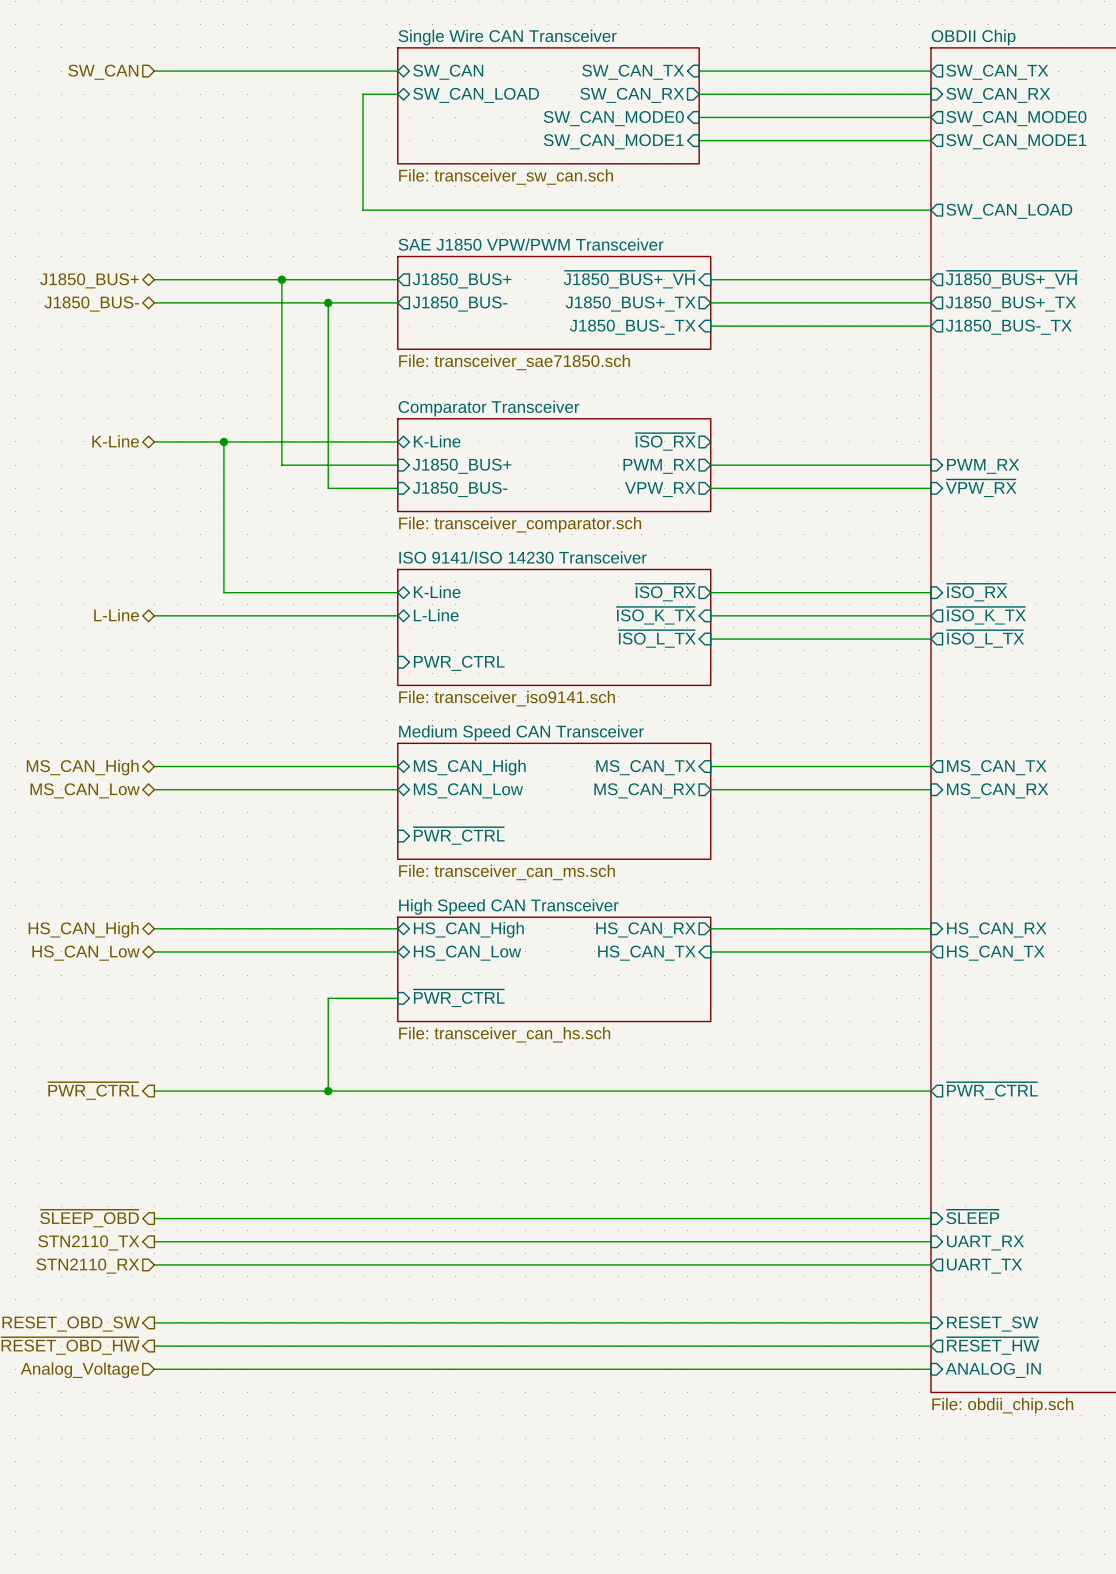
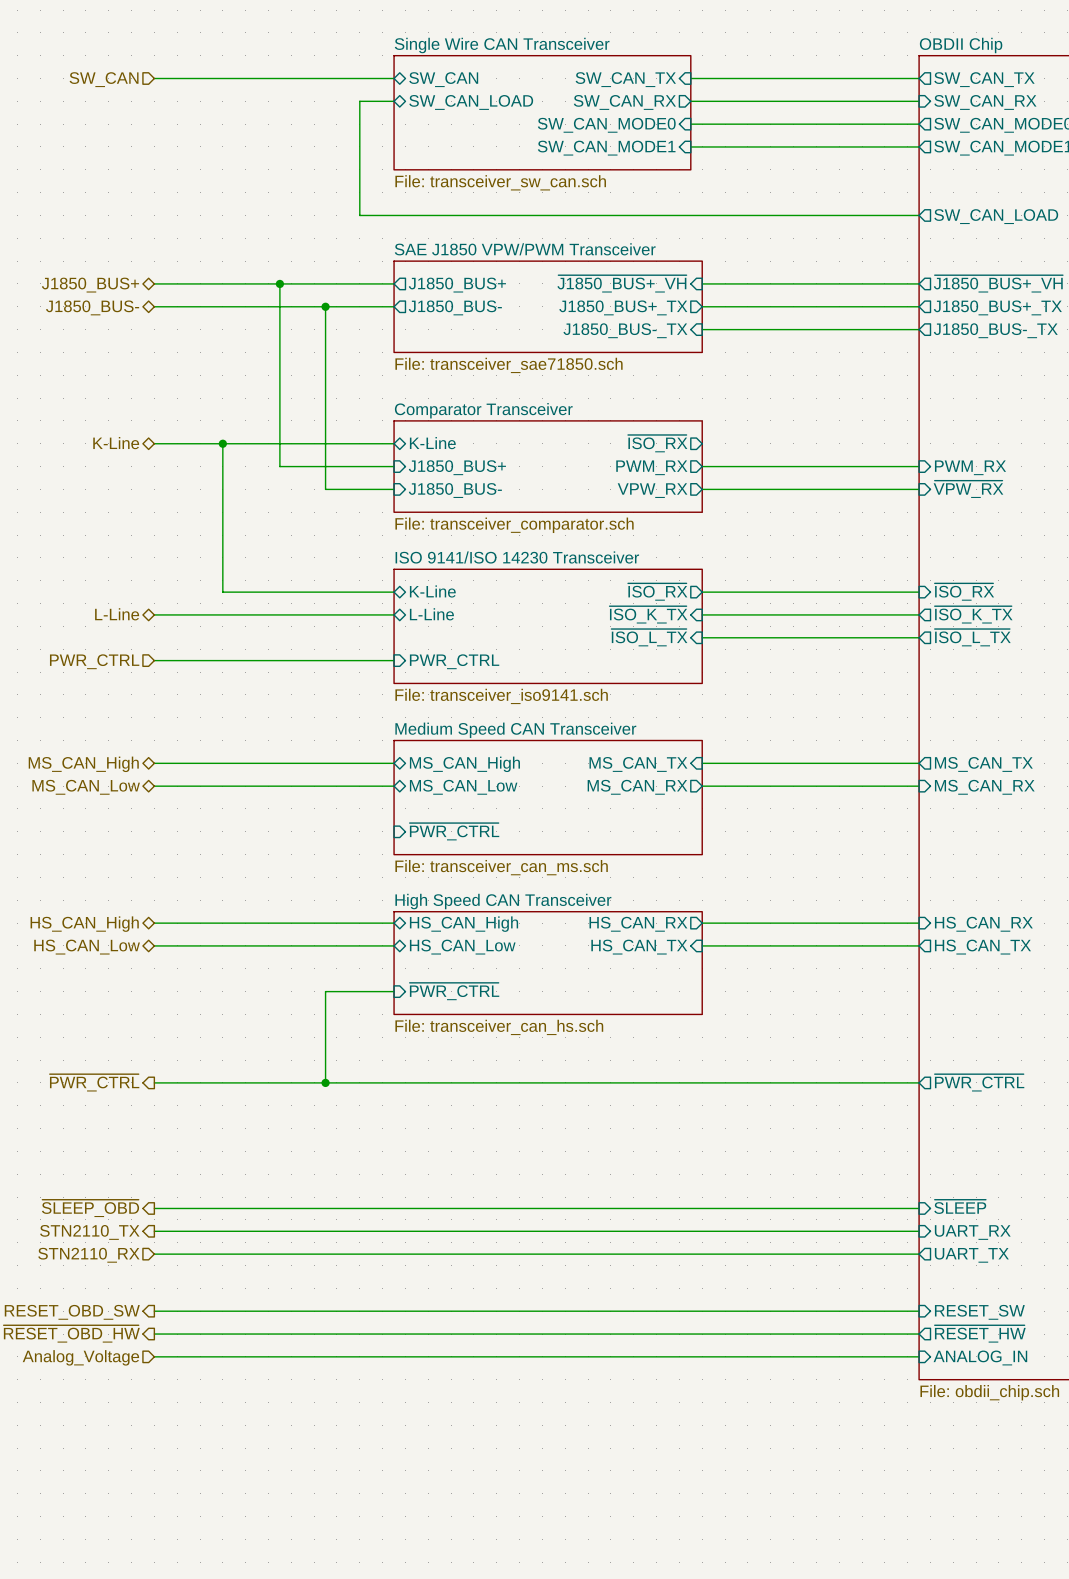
wire: none -> (154, 660) (394, 660)
hierarchical label: none -> PWR_CTRL (94, 661)

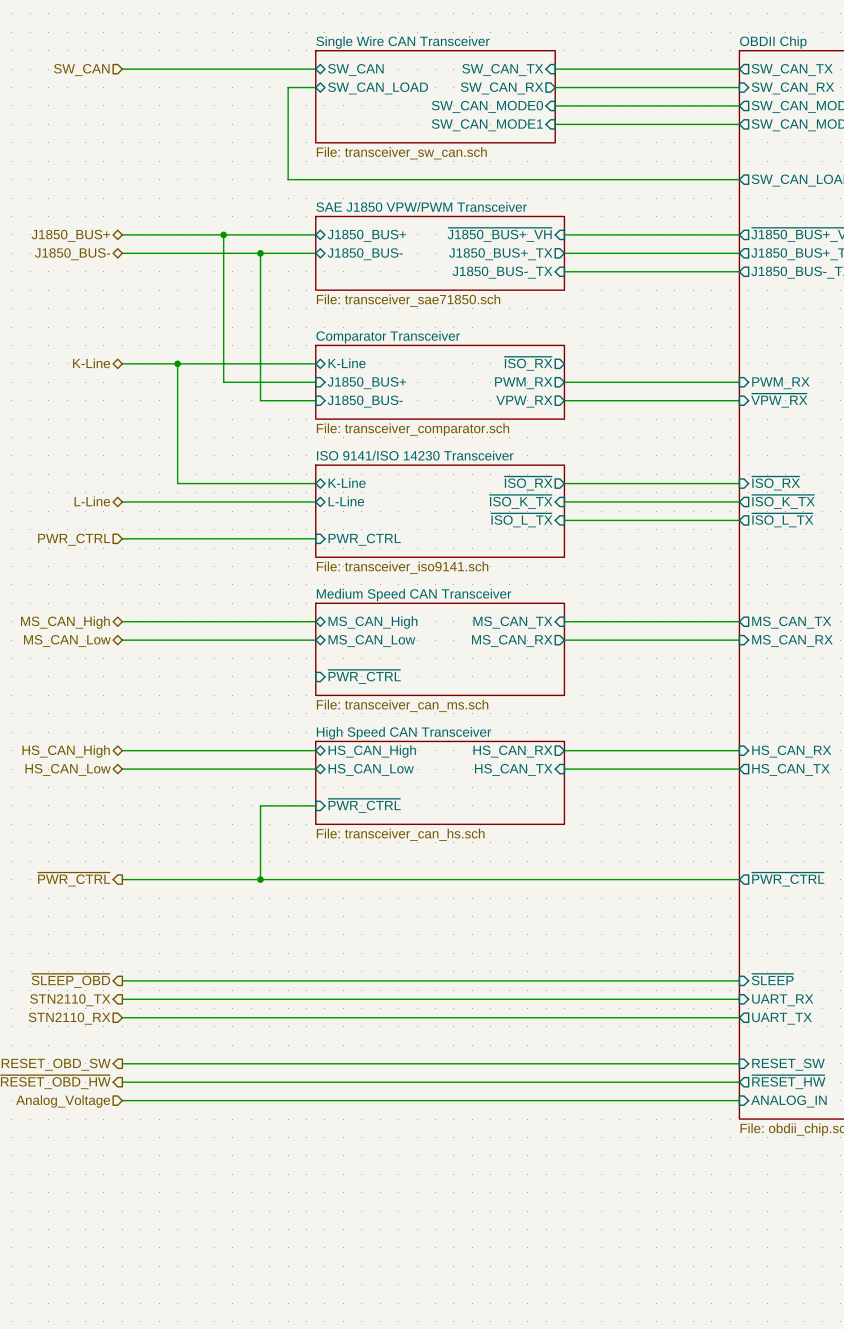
sheet pin shape: output (457, 285) -> bidirectional (366, 235)
sheet pin shape: output (455, 307) -> bidirectional (365, 254)

